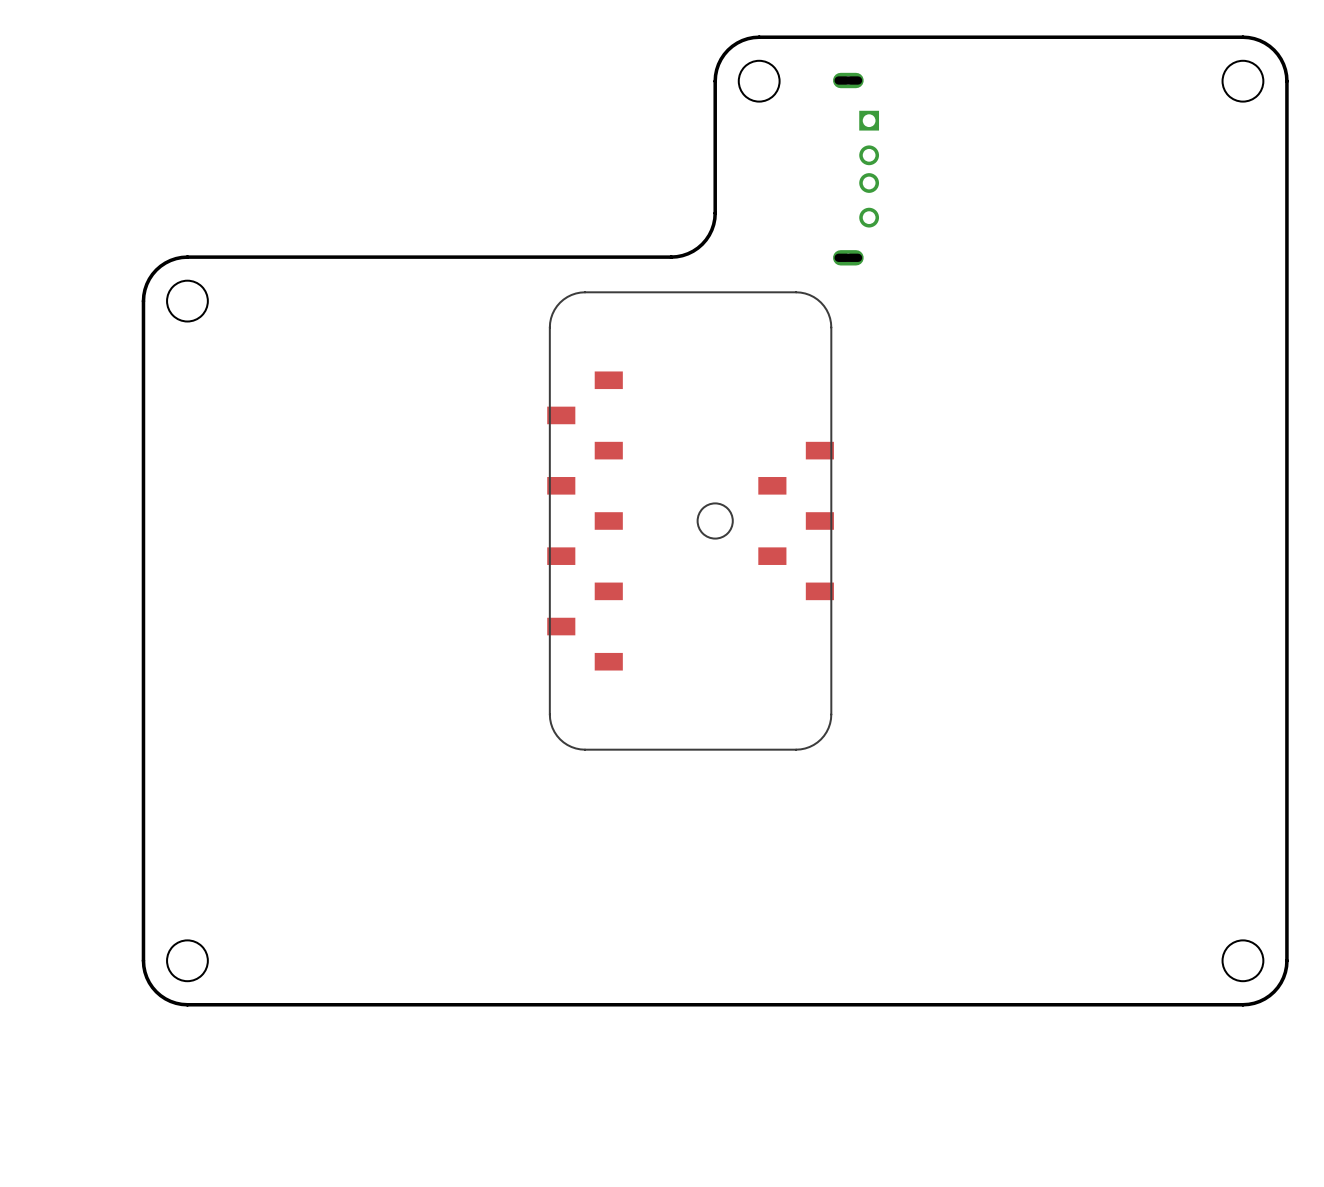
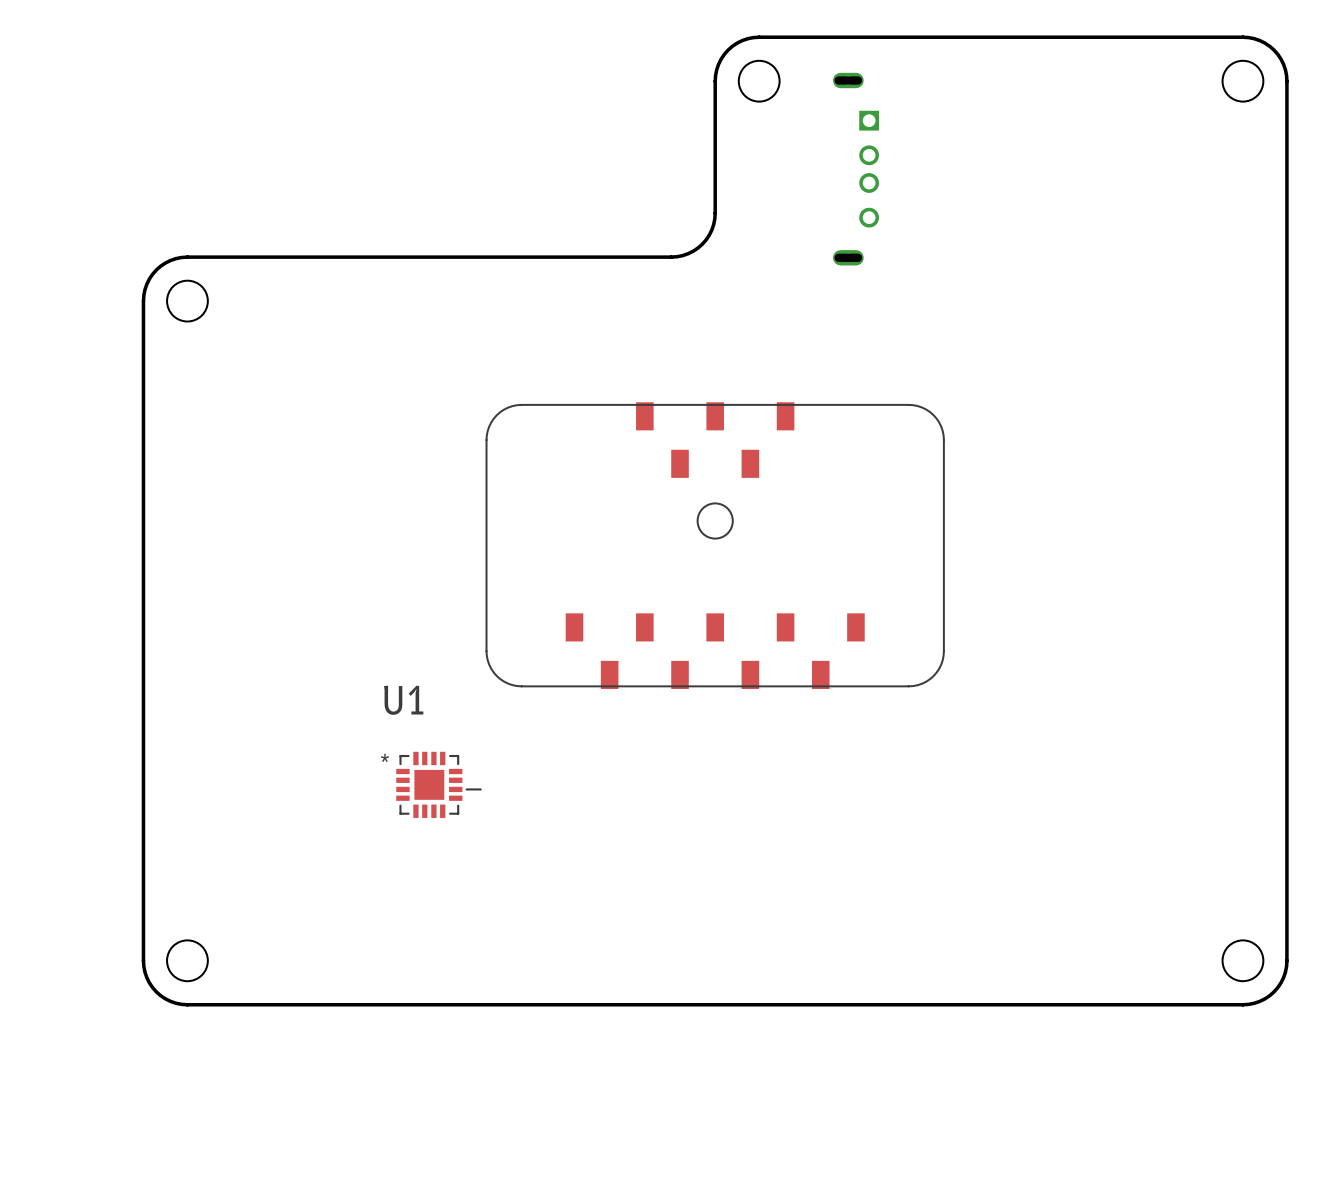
part rotation: 0° (690, 520) -> 90° counterclockwise (715, 545)
U1: none -> (439, 784)

